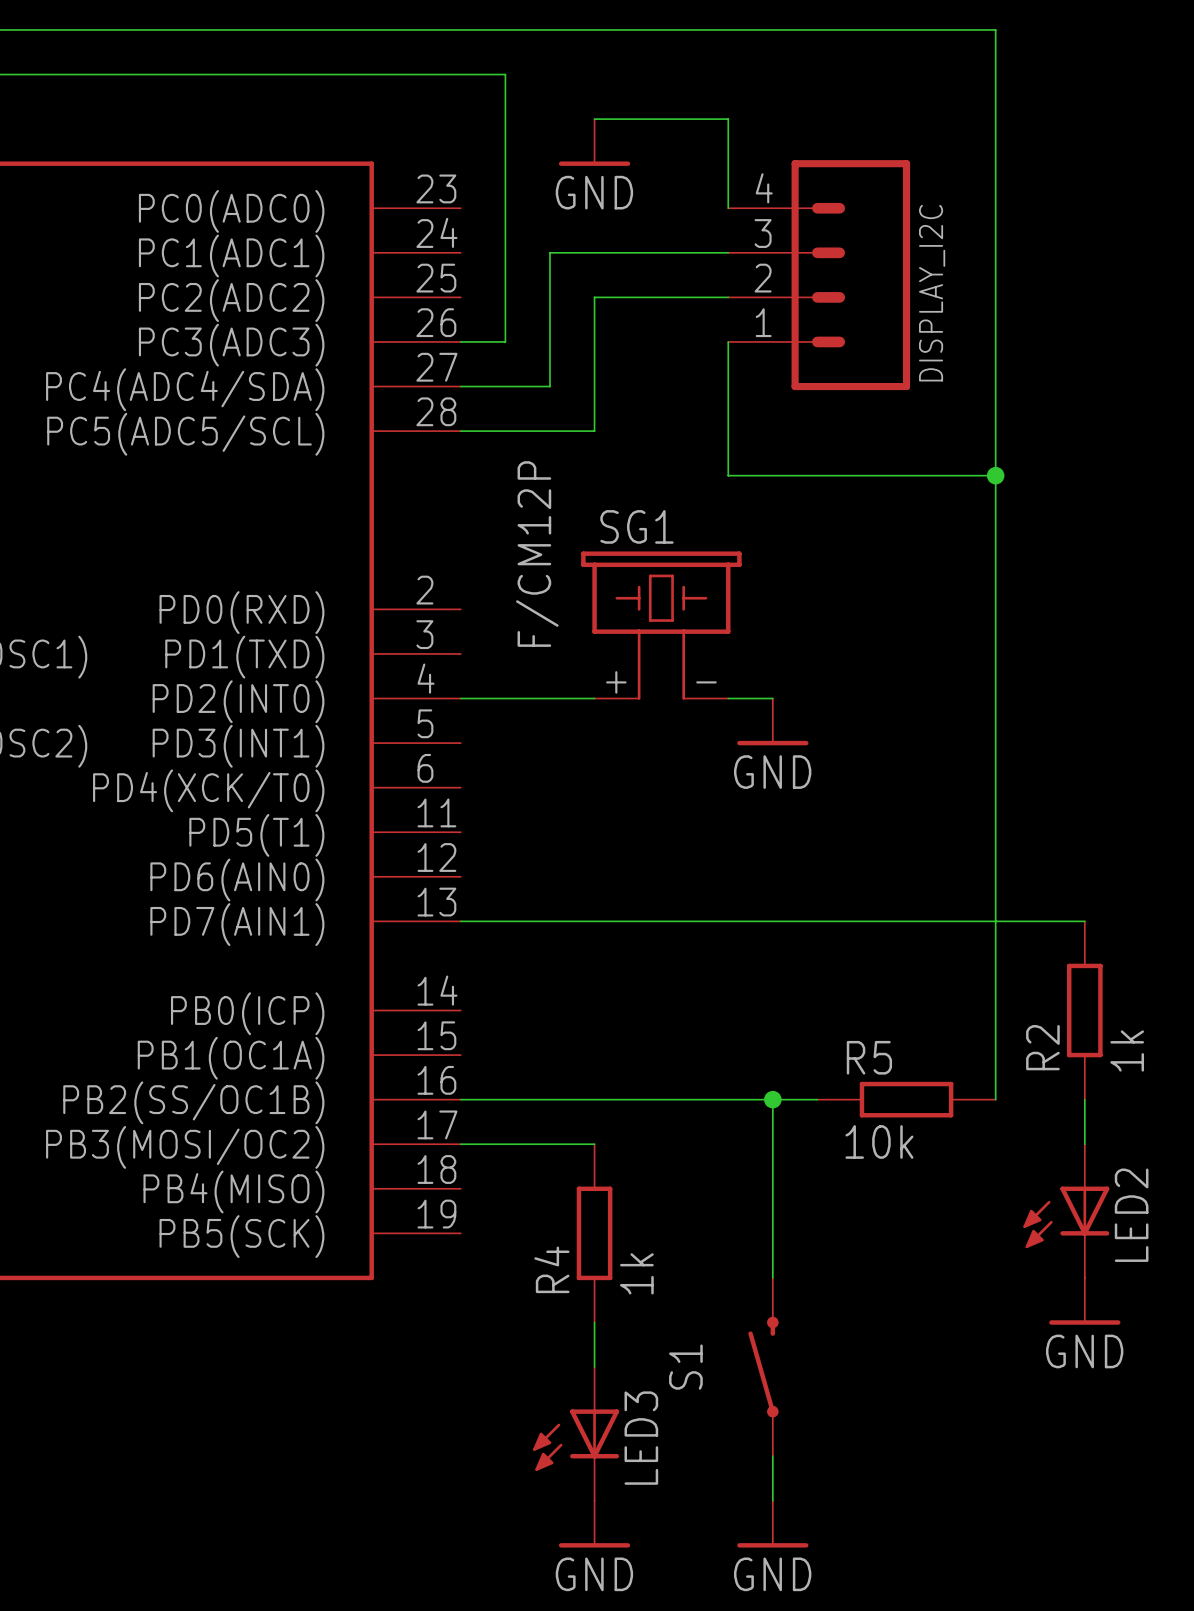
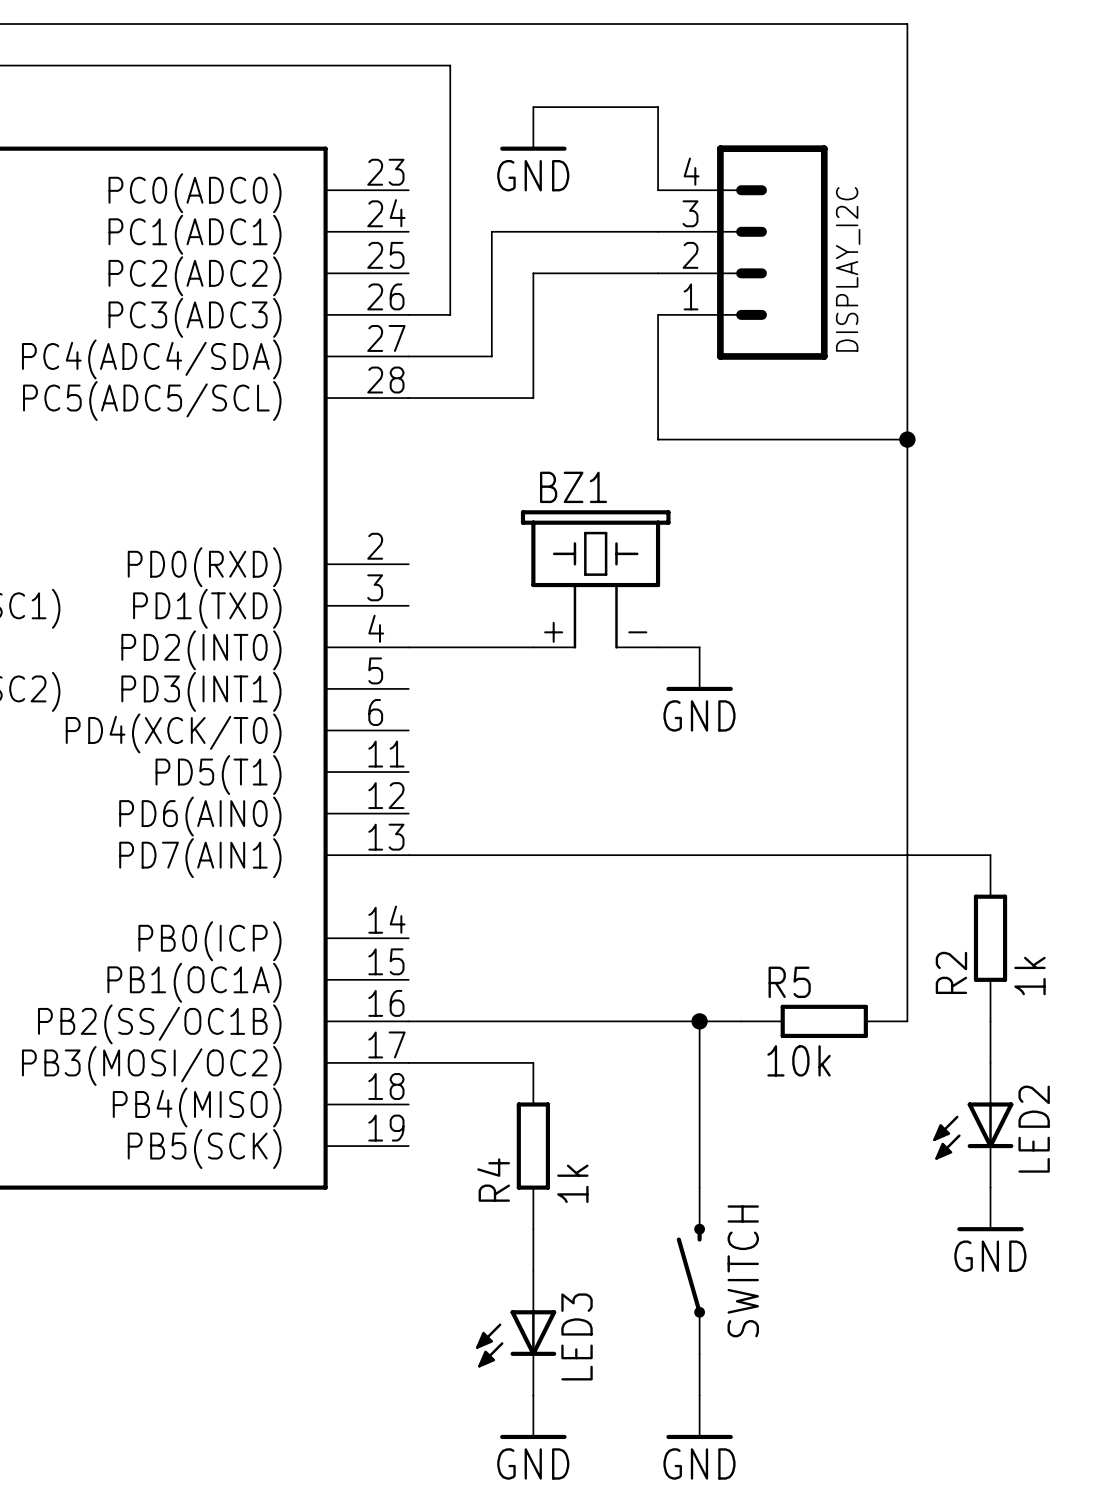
SG1 name: SG1 (636, 526) -> BZ1 (573, 487)
SG1 value: F/CM12P (537, 554) -> none
S1 name: S1 (685, 1367) -> SWITCH (743, 1271)

